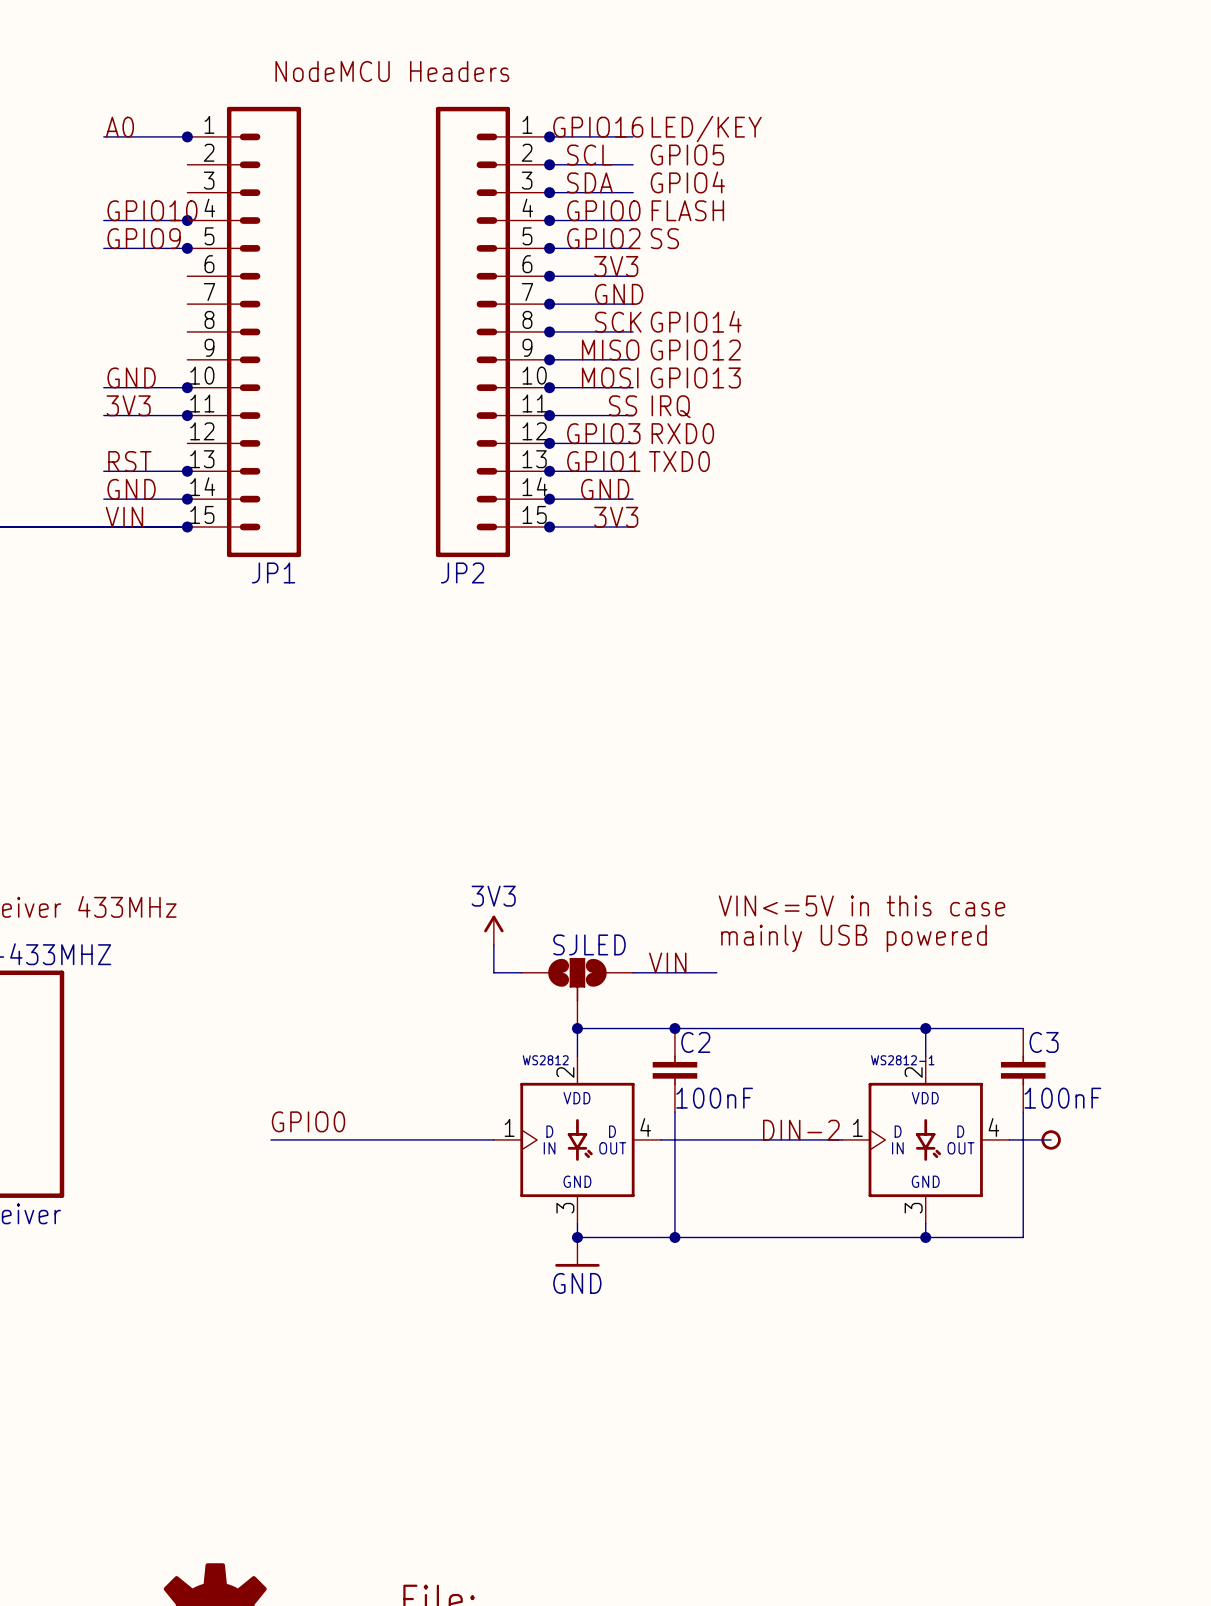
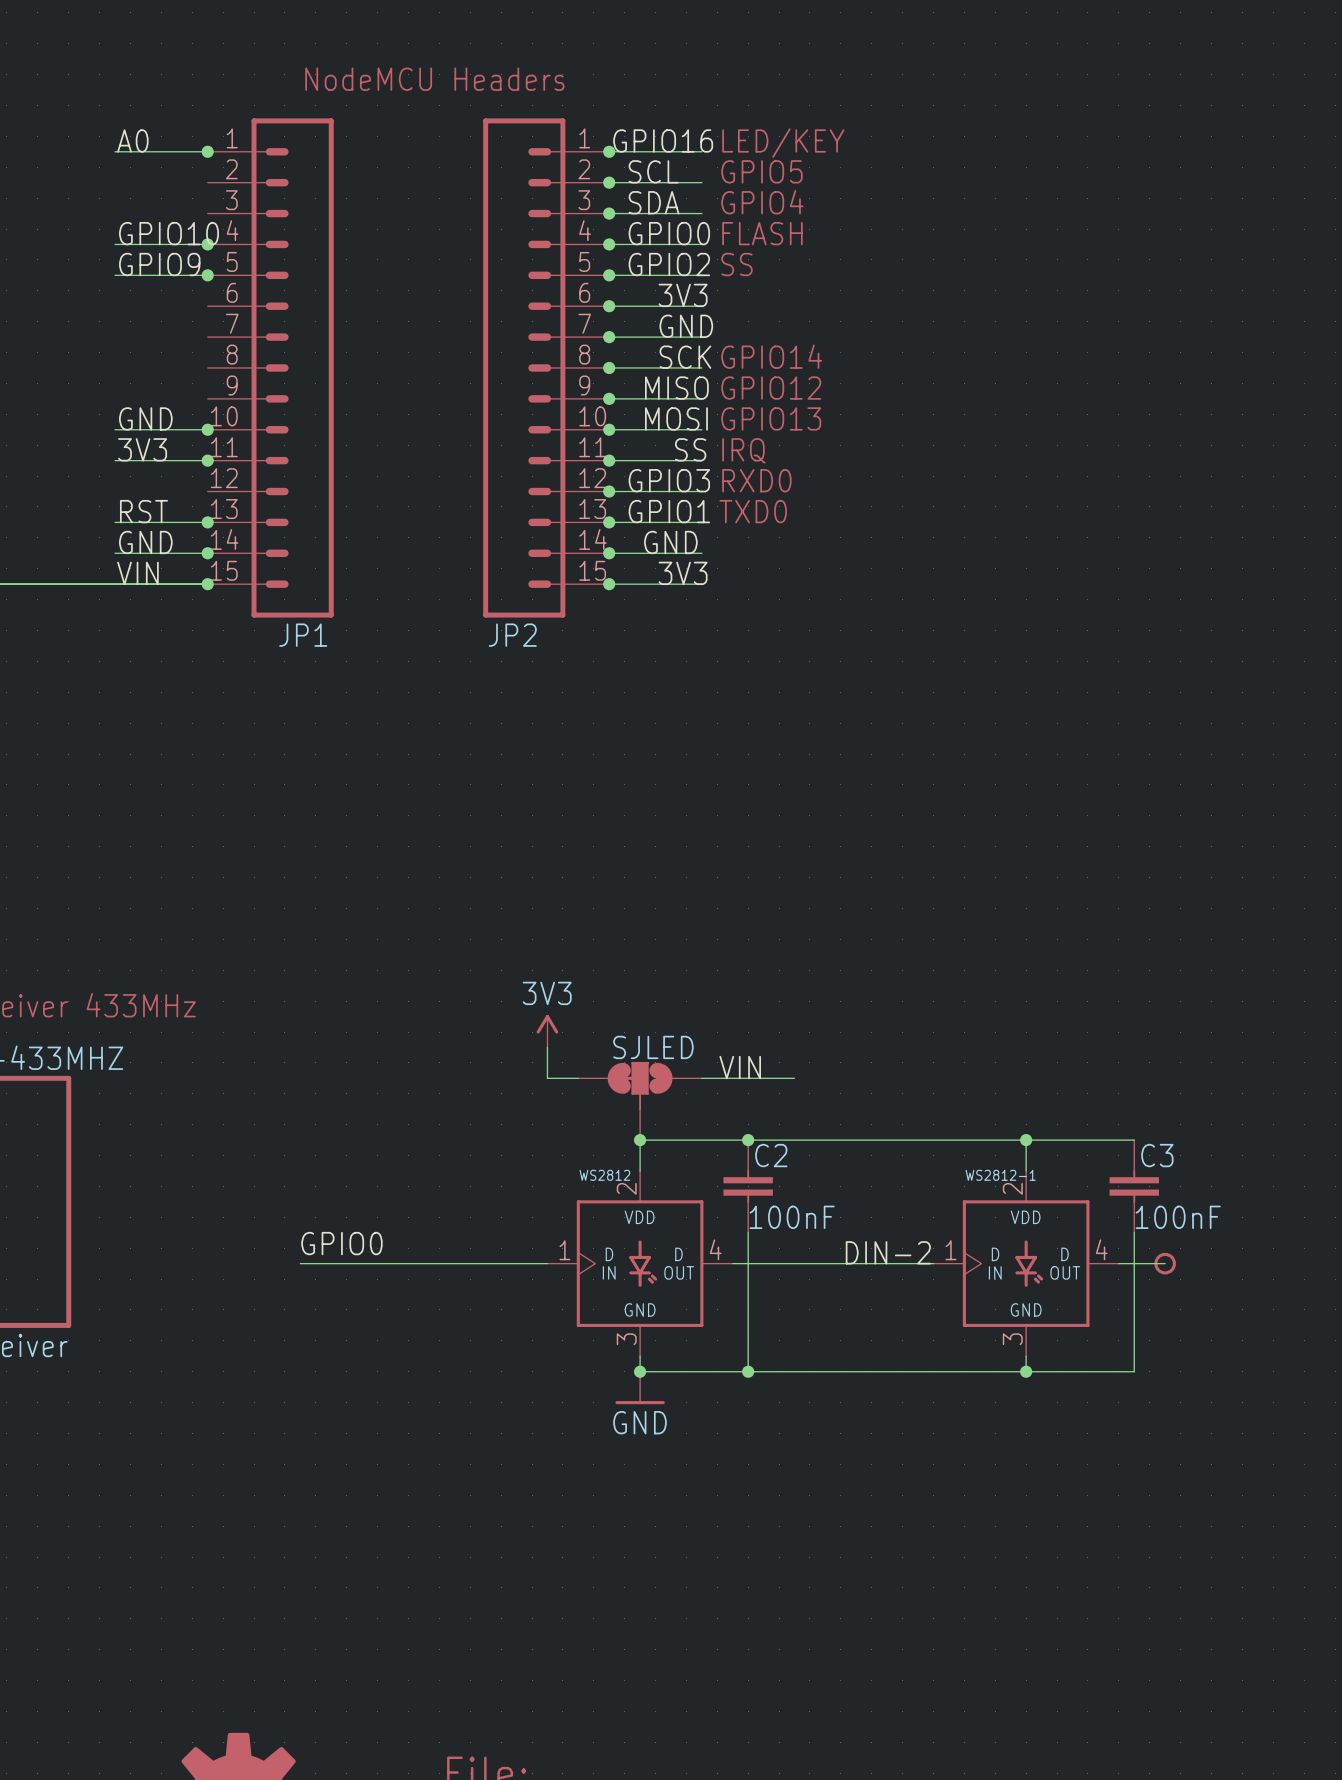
text: VIN<=5V in this case (861, 905) -> none
text: mainly USB powered (854, 938) -> none
SJLED symbol: [521, 958, 634, 1029] -> [578, 1061, 702, 1141]

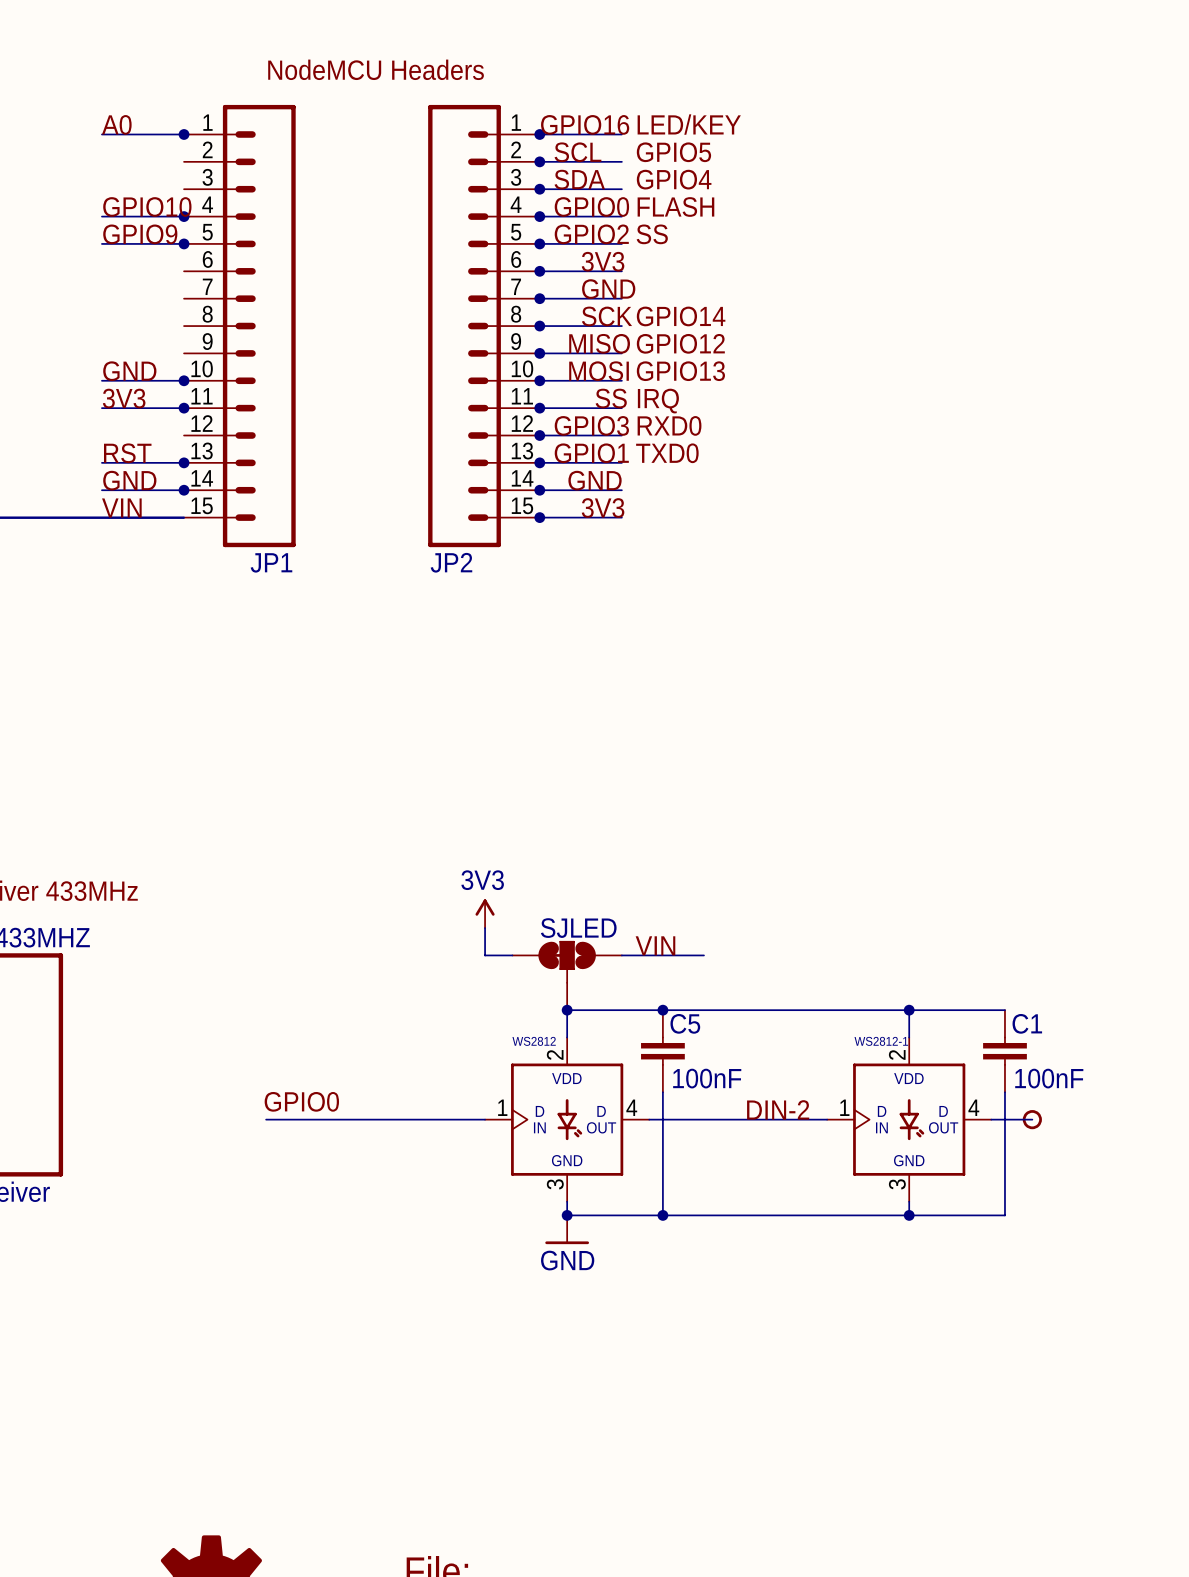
junction: (207, 584) -> none
C2 name: C2 (771, 1155) -> C5 (685, 1023)
C3 name: C3 (1157, 1155) -> C1 (1027, 1023)

